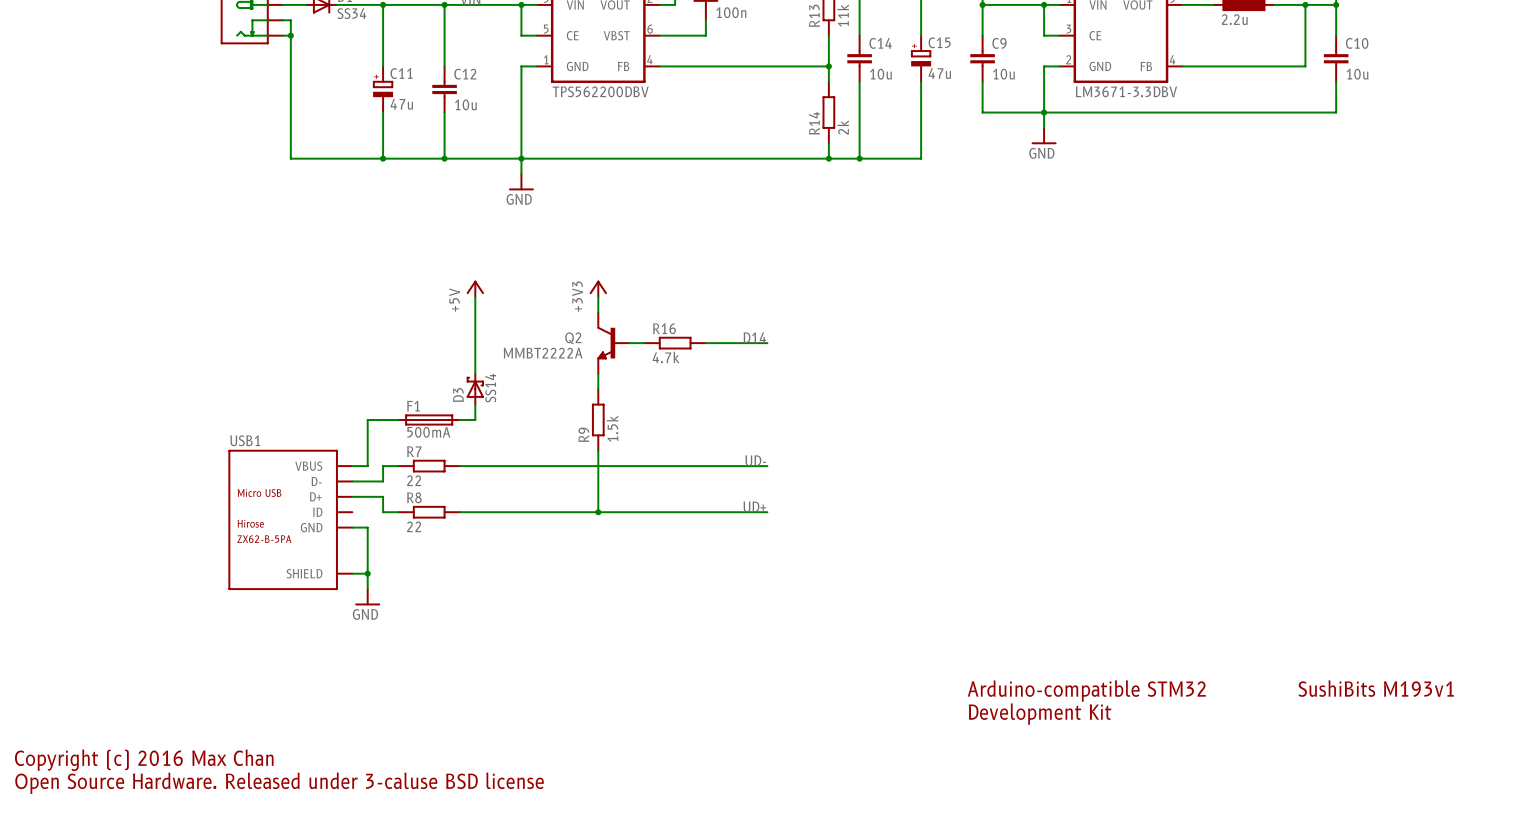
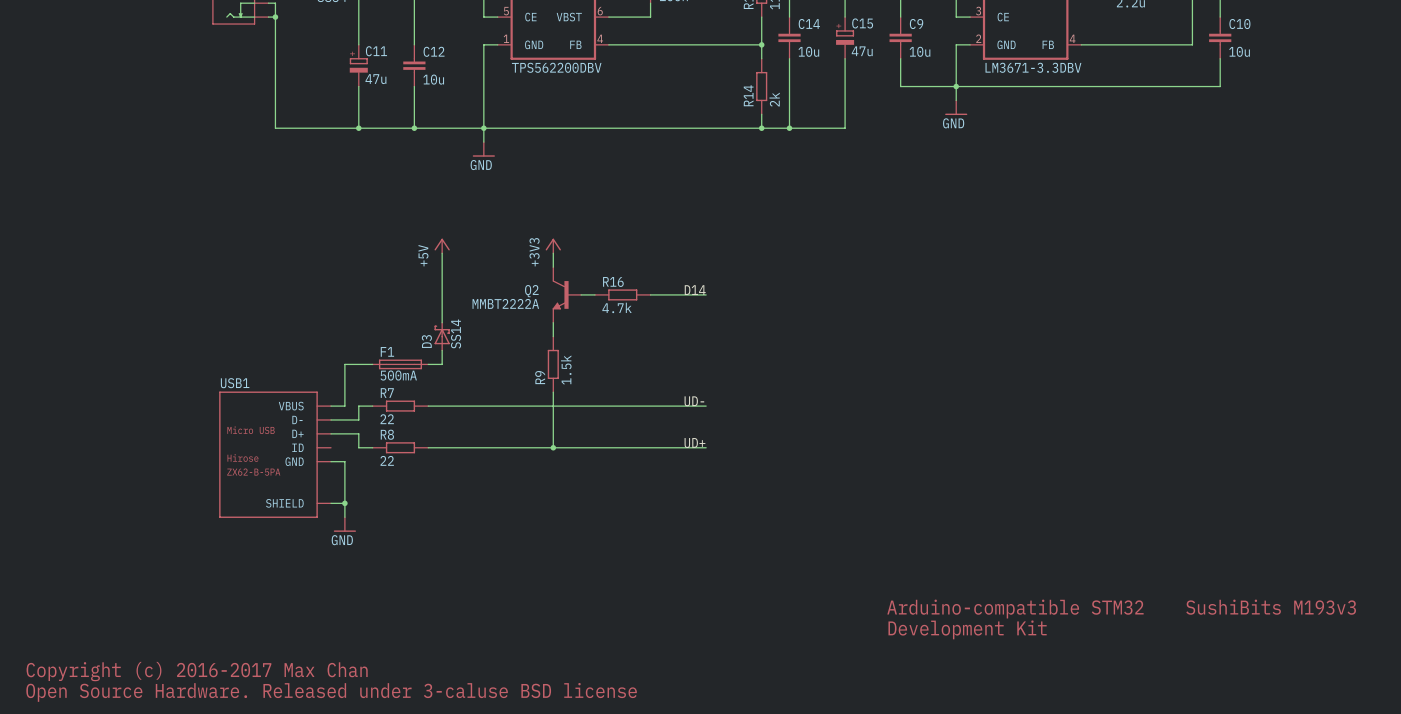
text: SushiBits M193v1 (1376, 688) -> SushiBits M193v3 (1271, 607)
text: Copyright (c) 2016 Max Chan (144, 760) -> Copyright (c) 2016-2017 Max Chan (197, 671)

